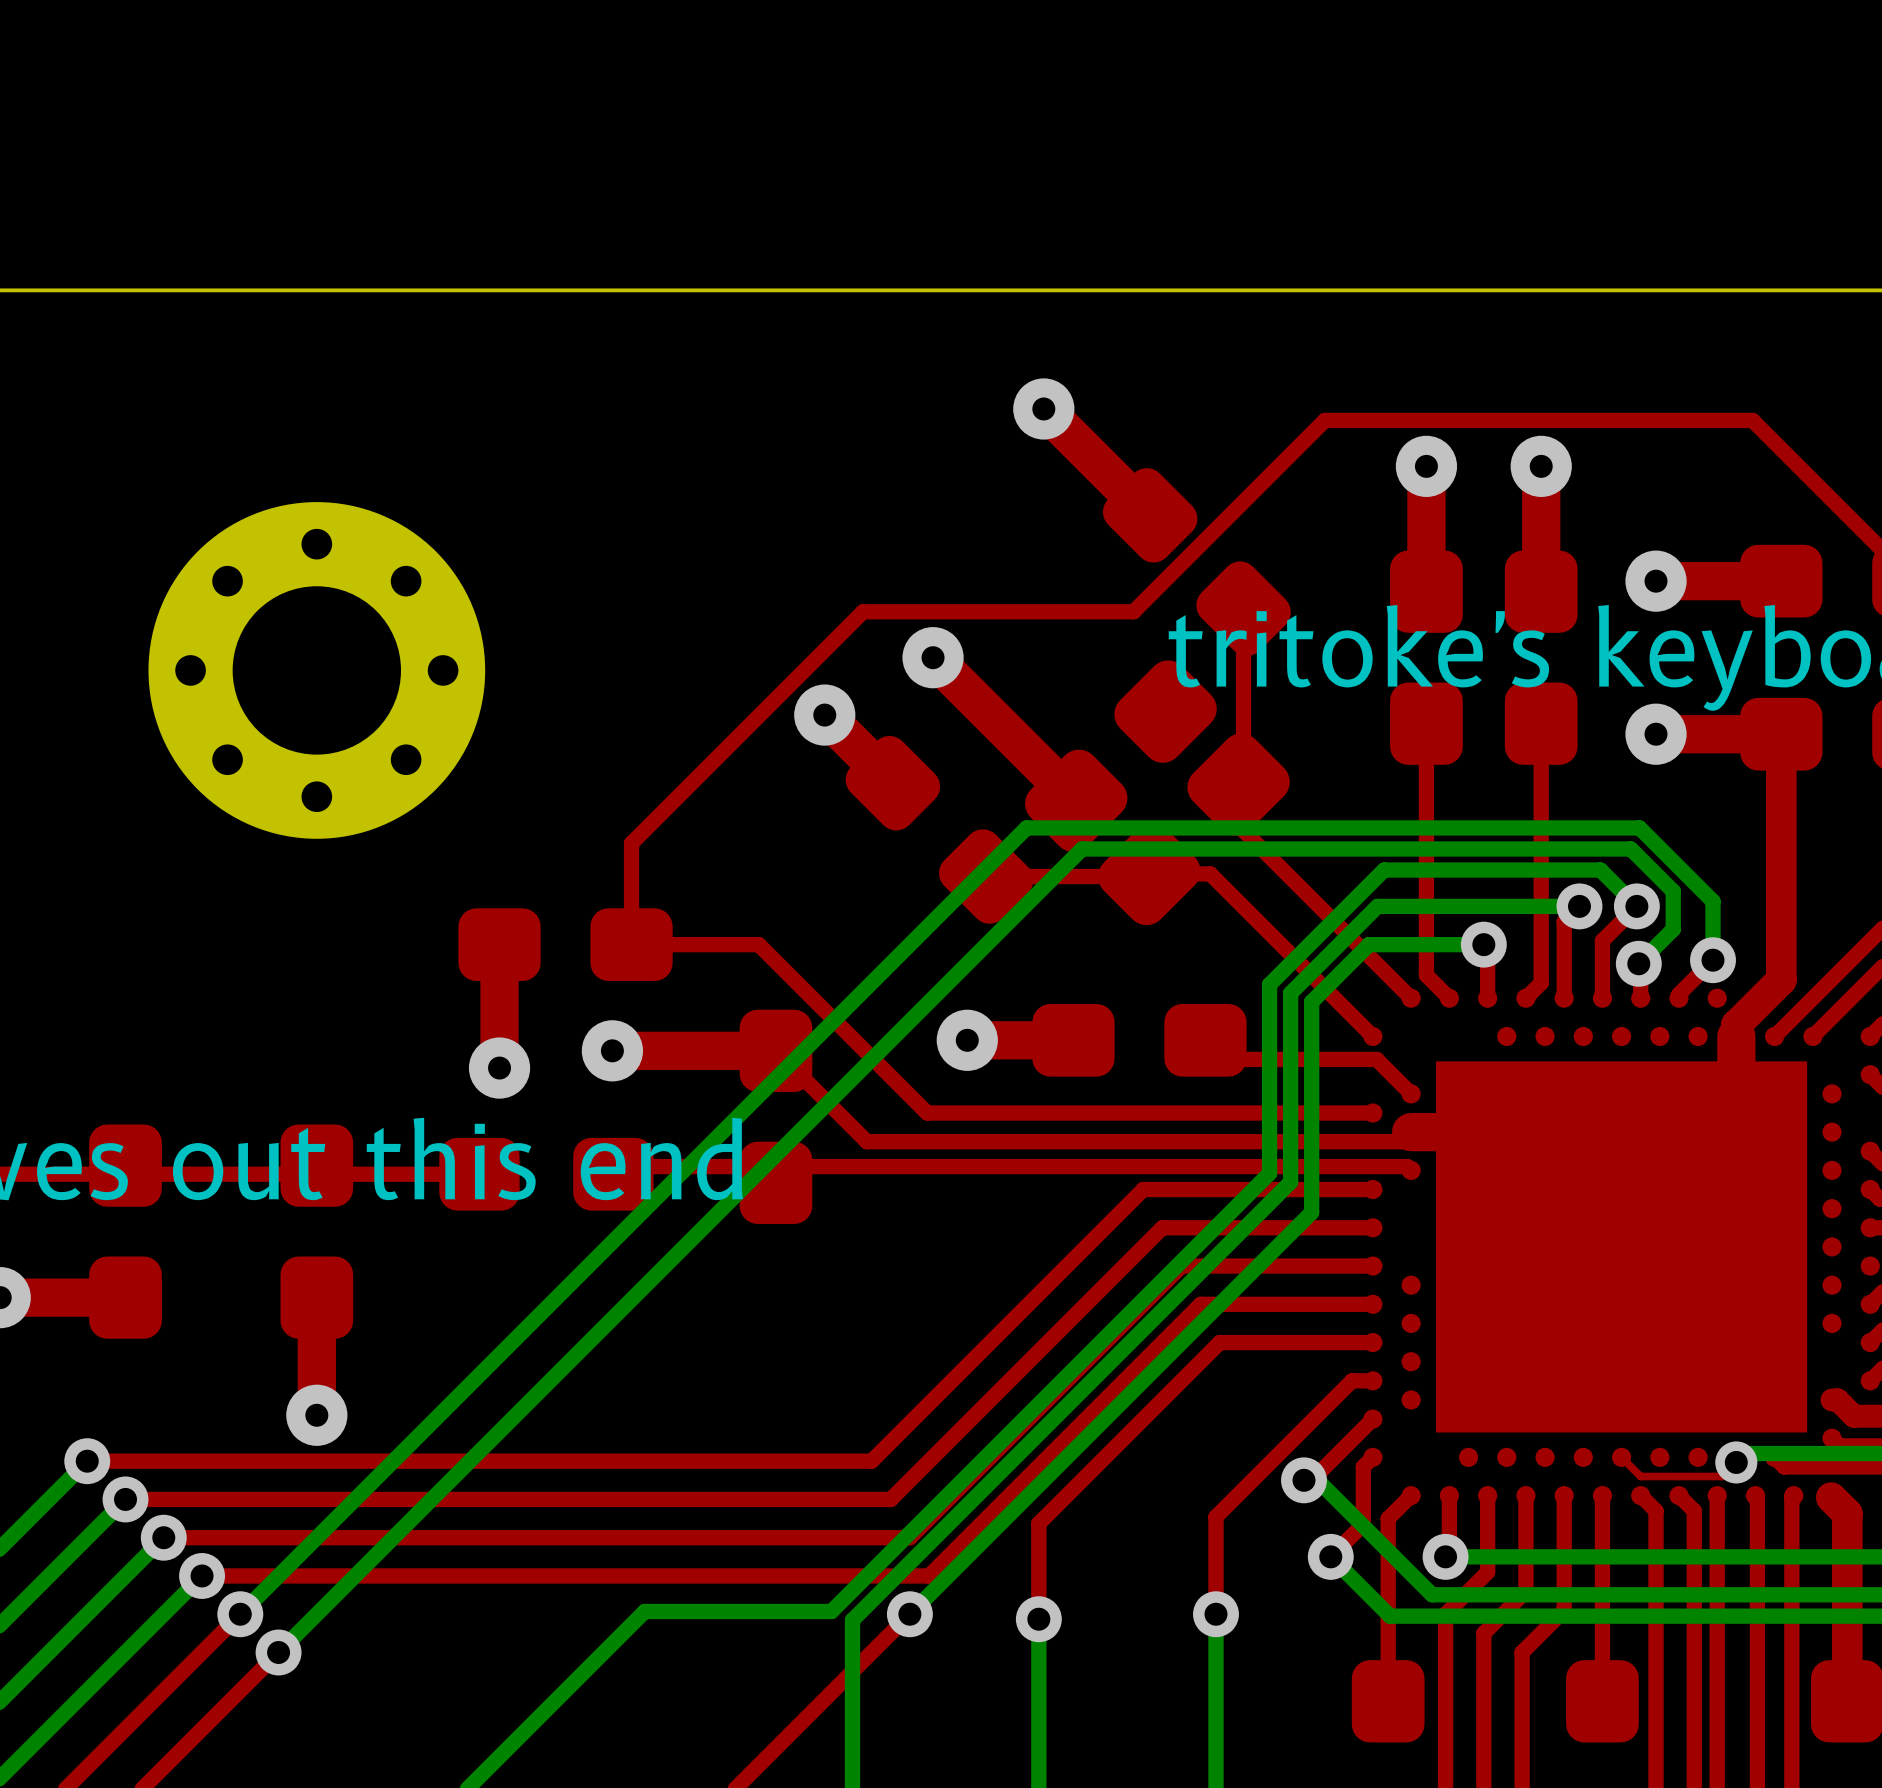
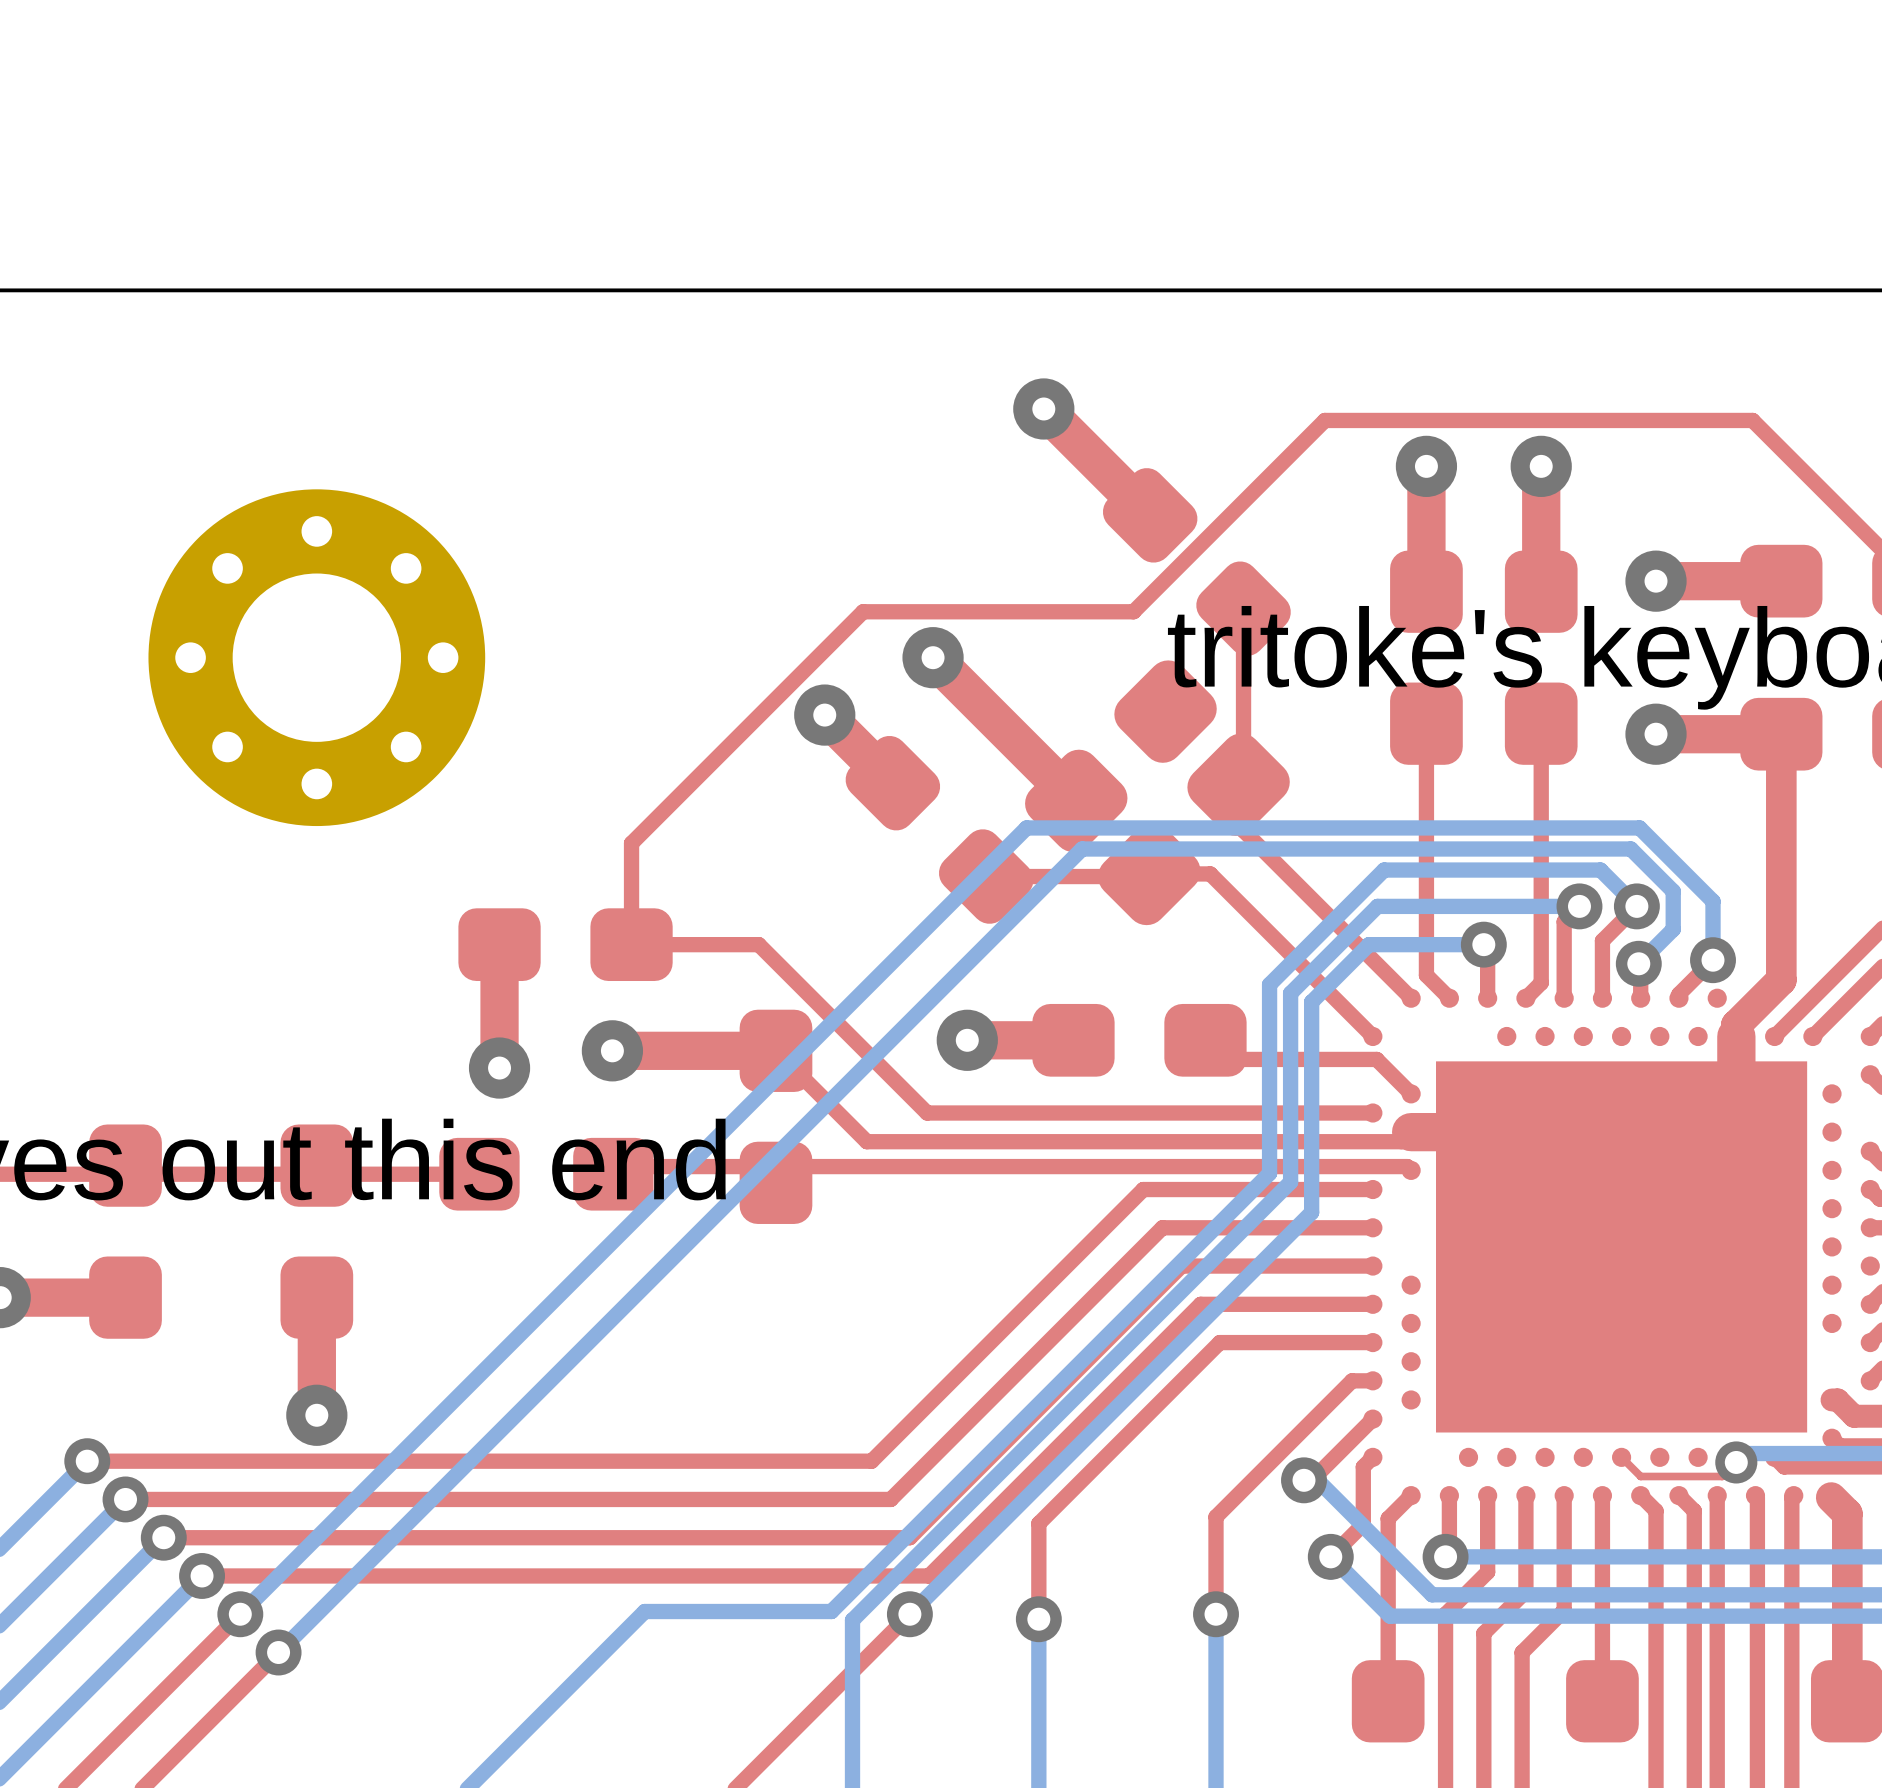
part position: (316, 670) -> (316, 657)

